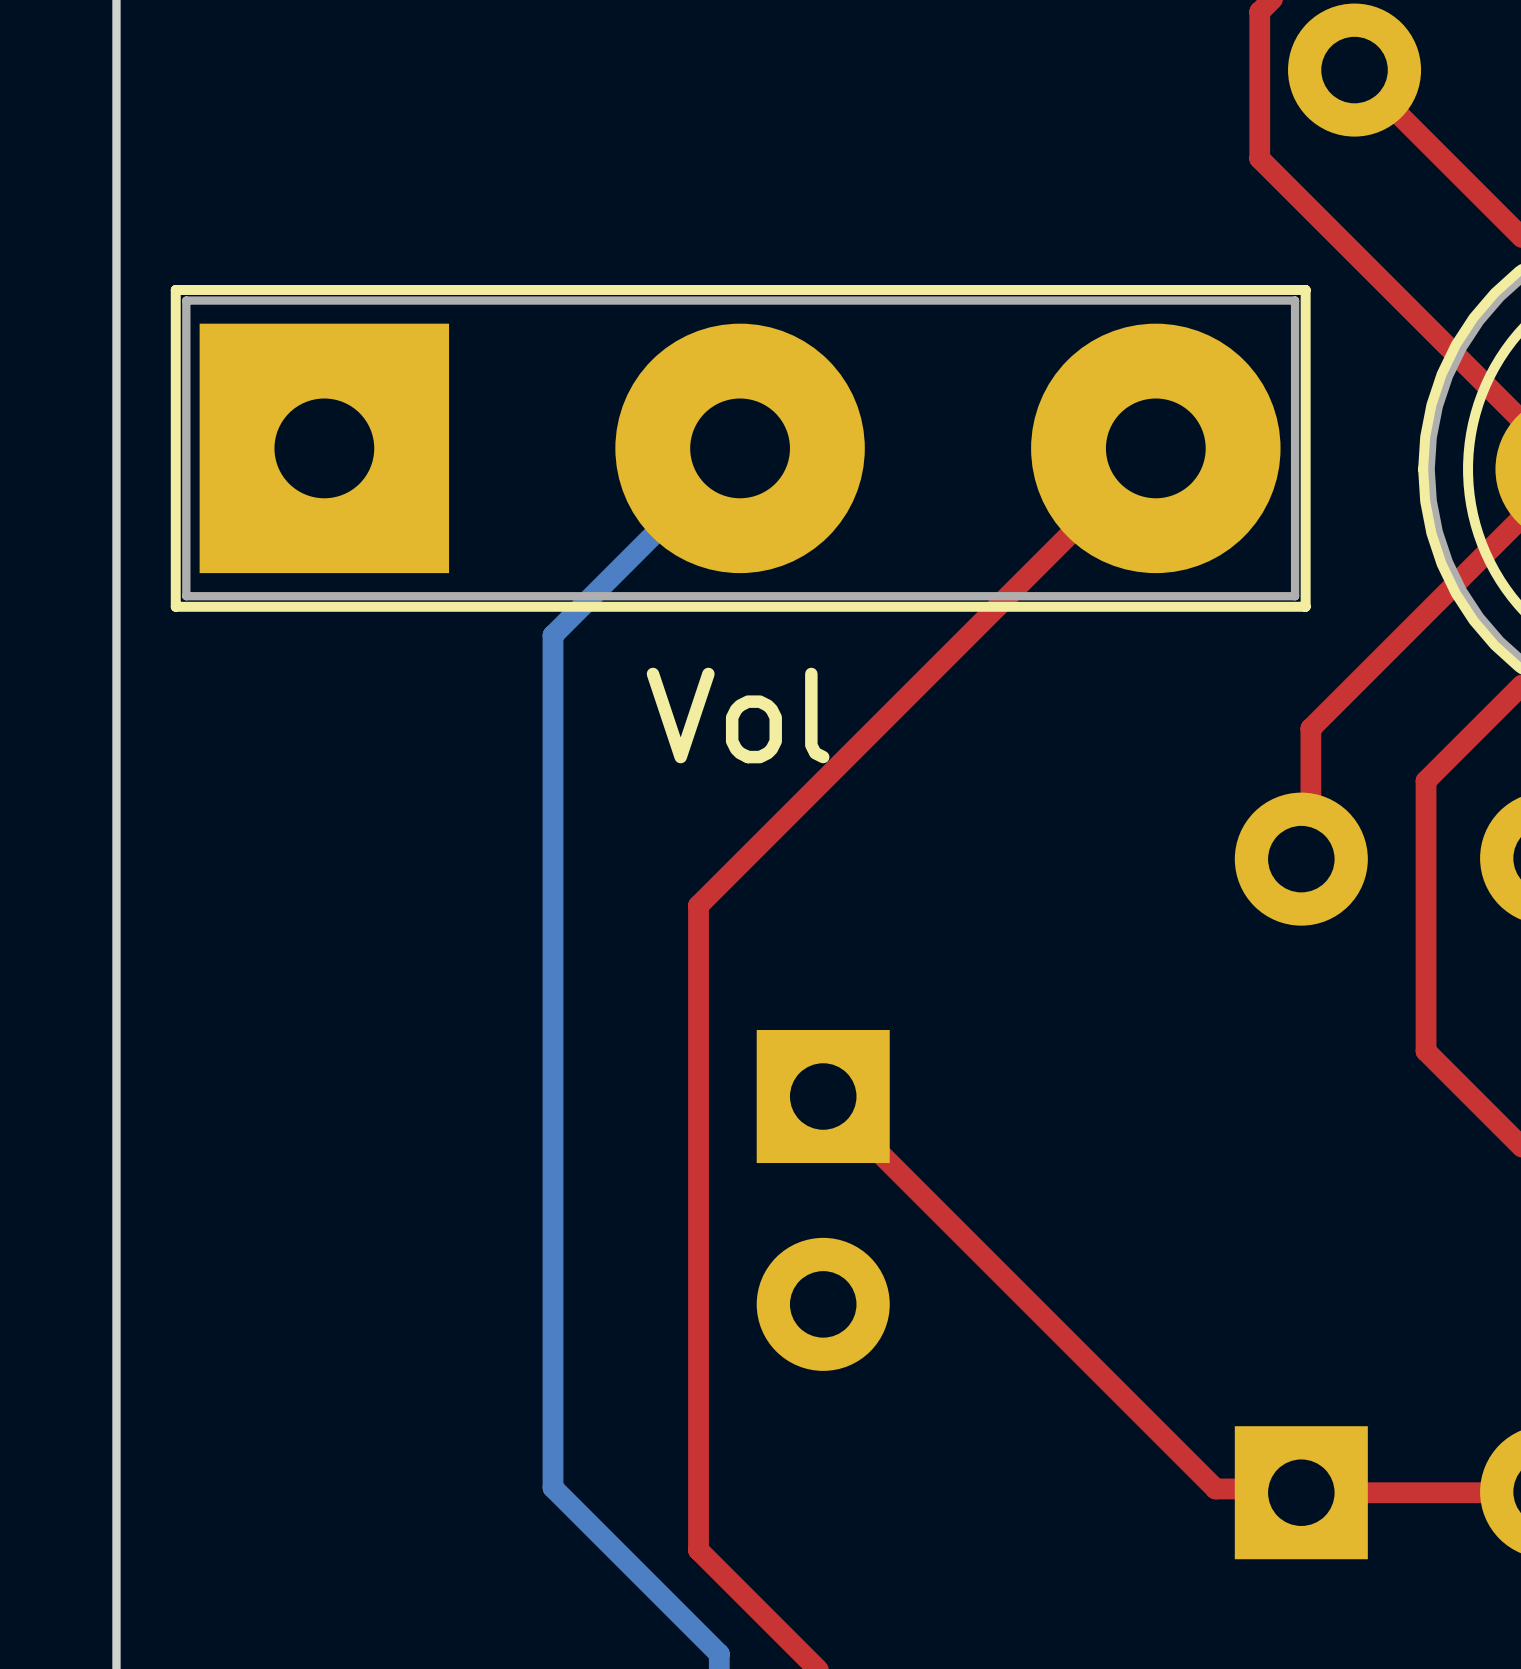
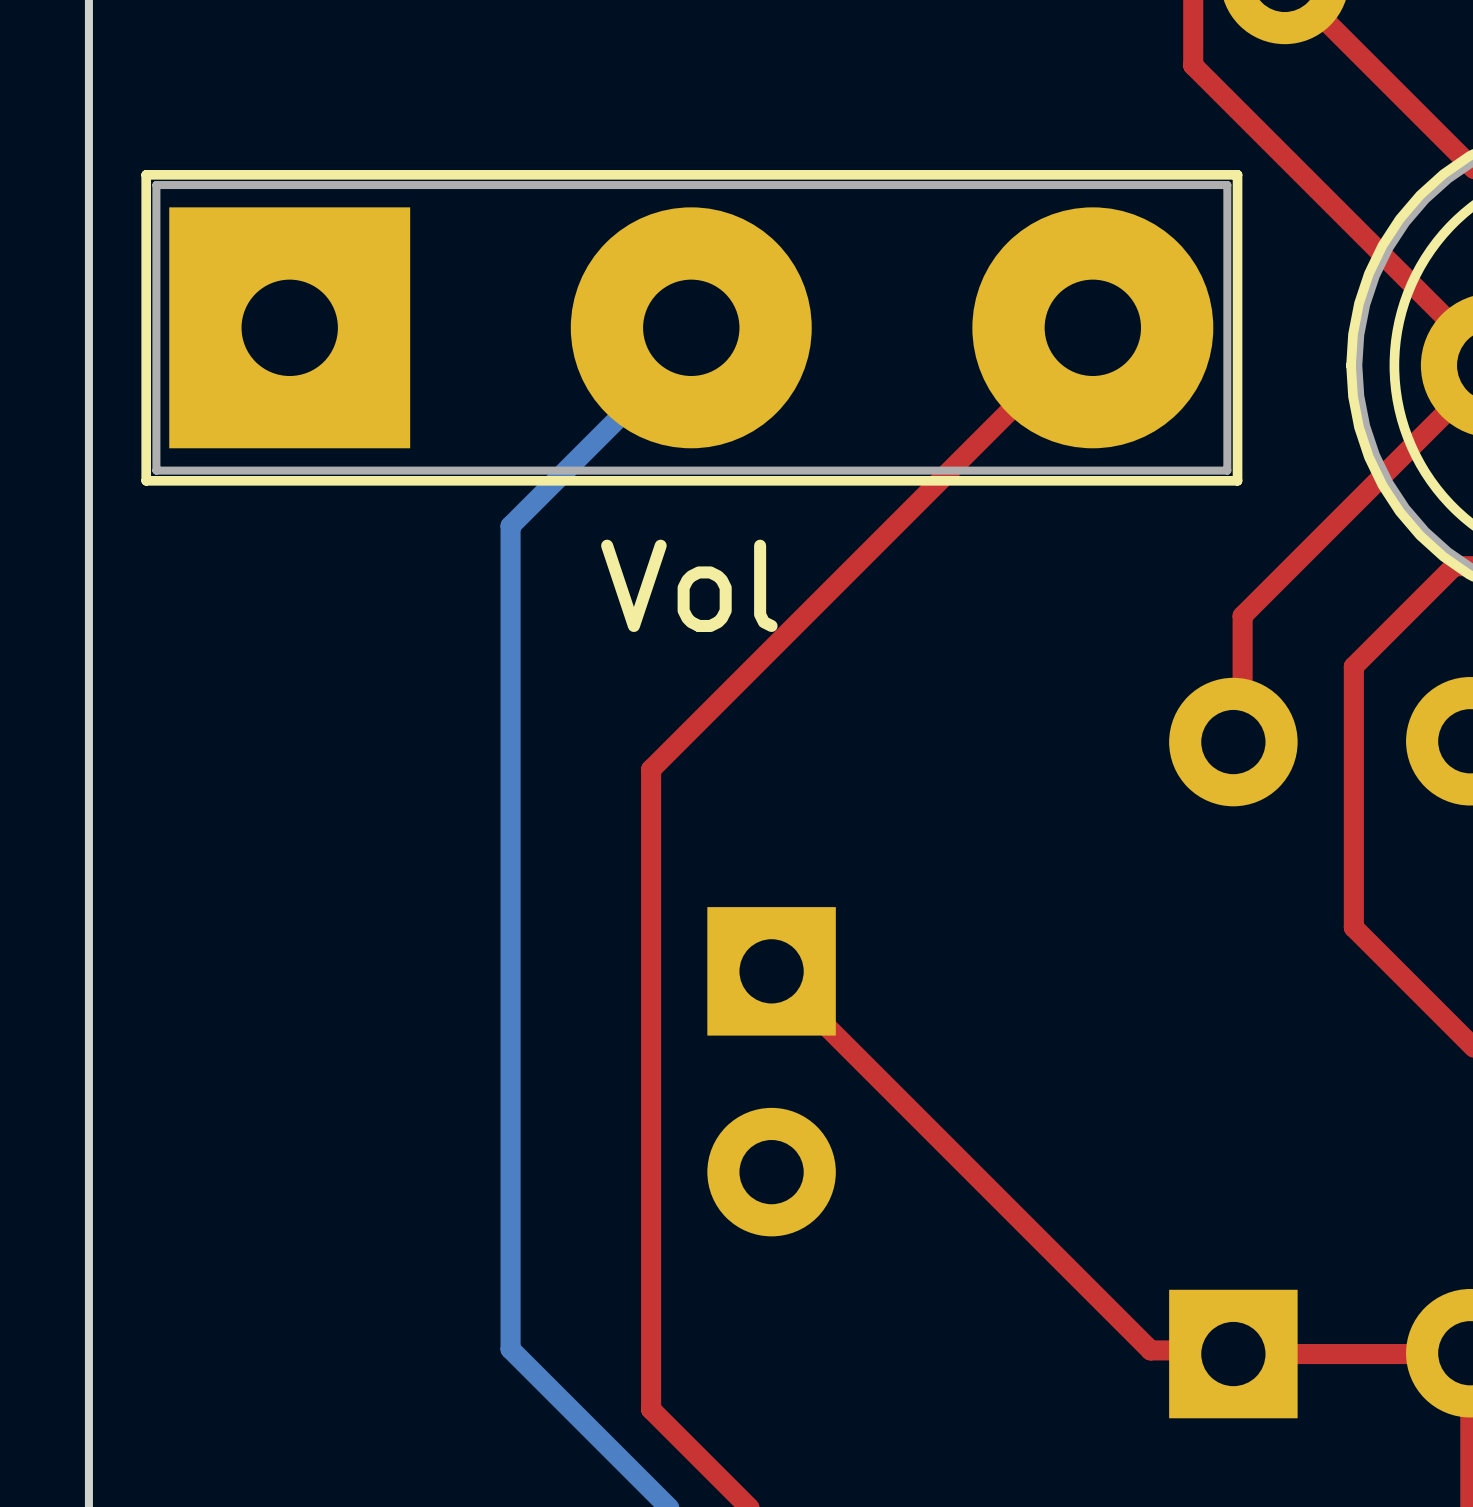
Vol position: (740, 448) -> (691, 327)
top track: (1155, 448) (698, 905) -> (1092, 327) (651, 769) (651, 787)

